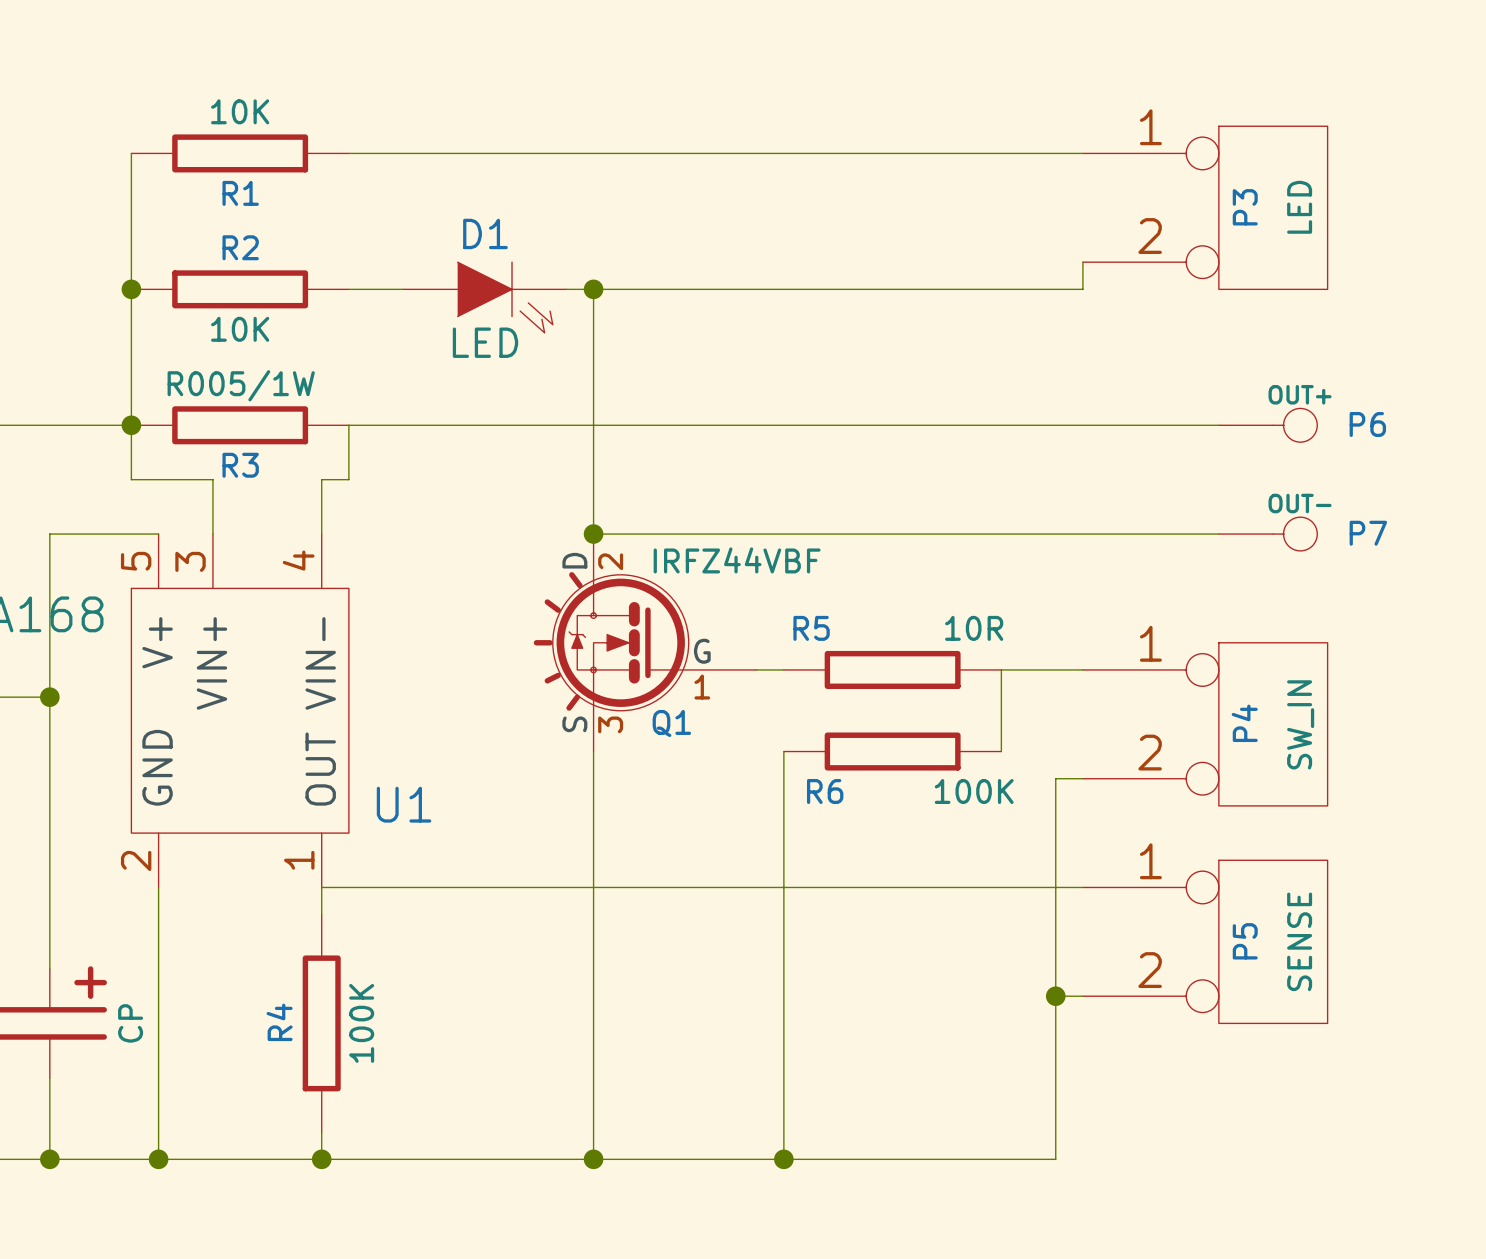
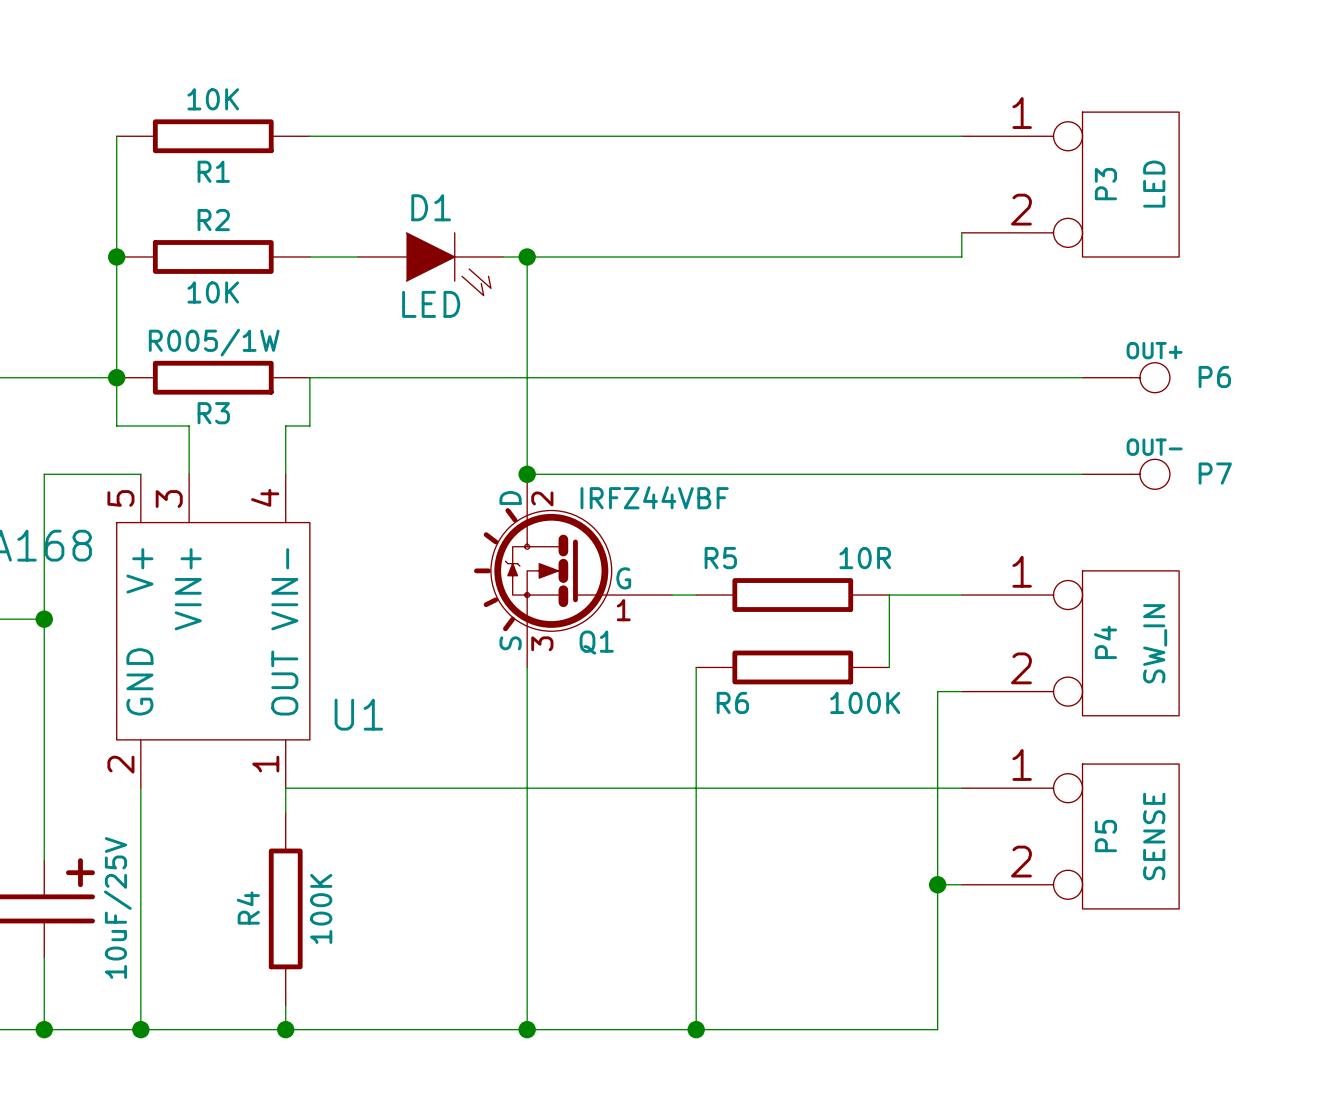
part value: CP (130, 1023) -> 10uF/25V (117, 908)

